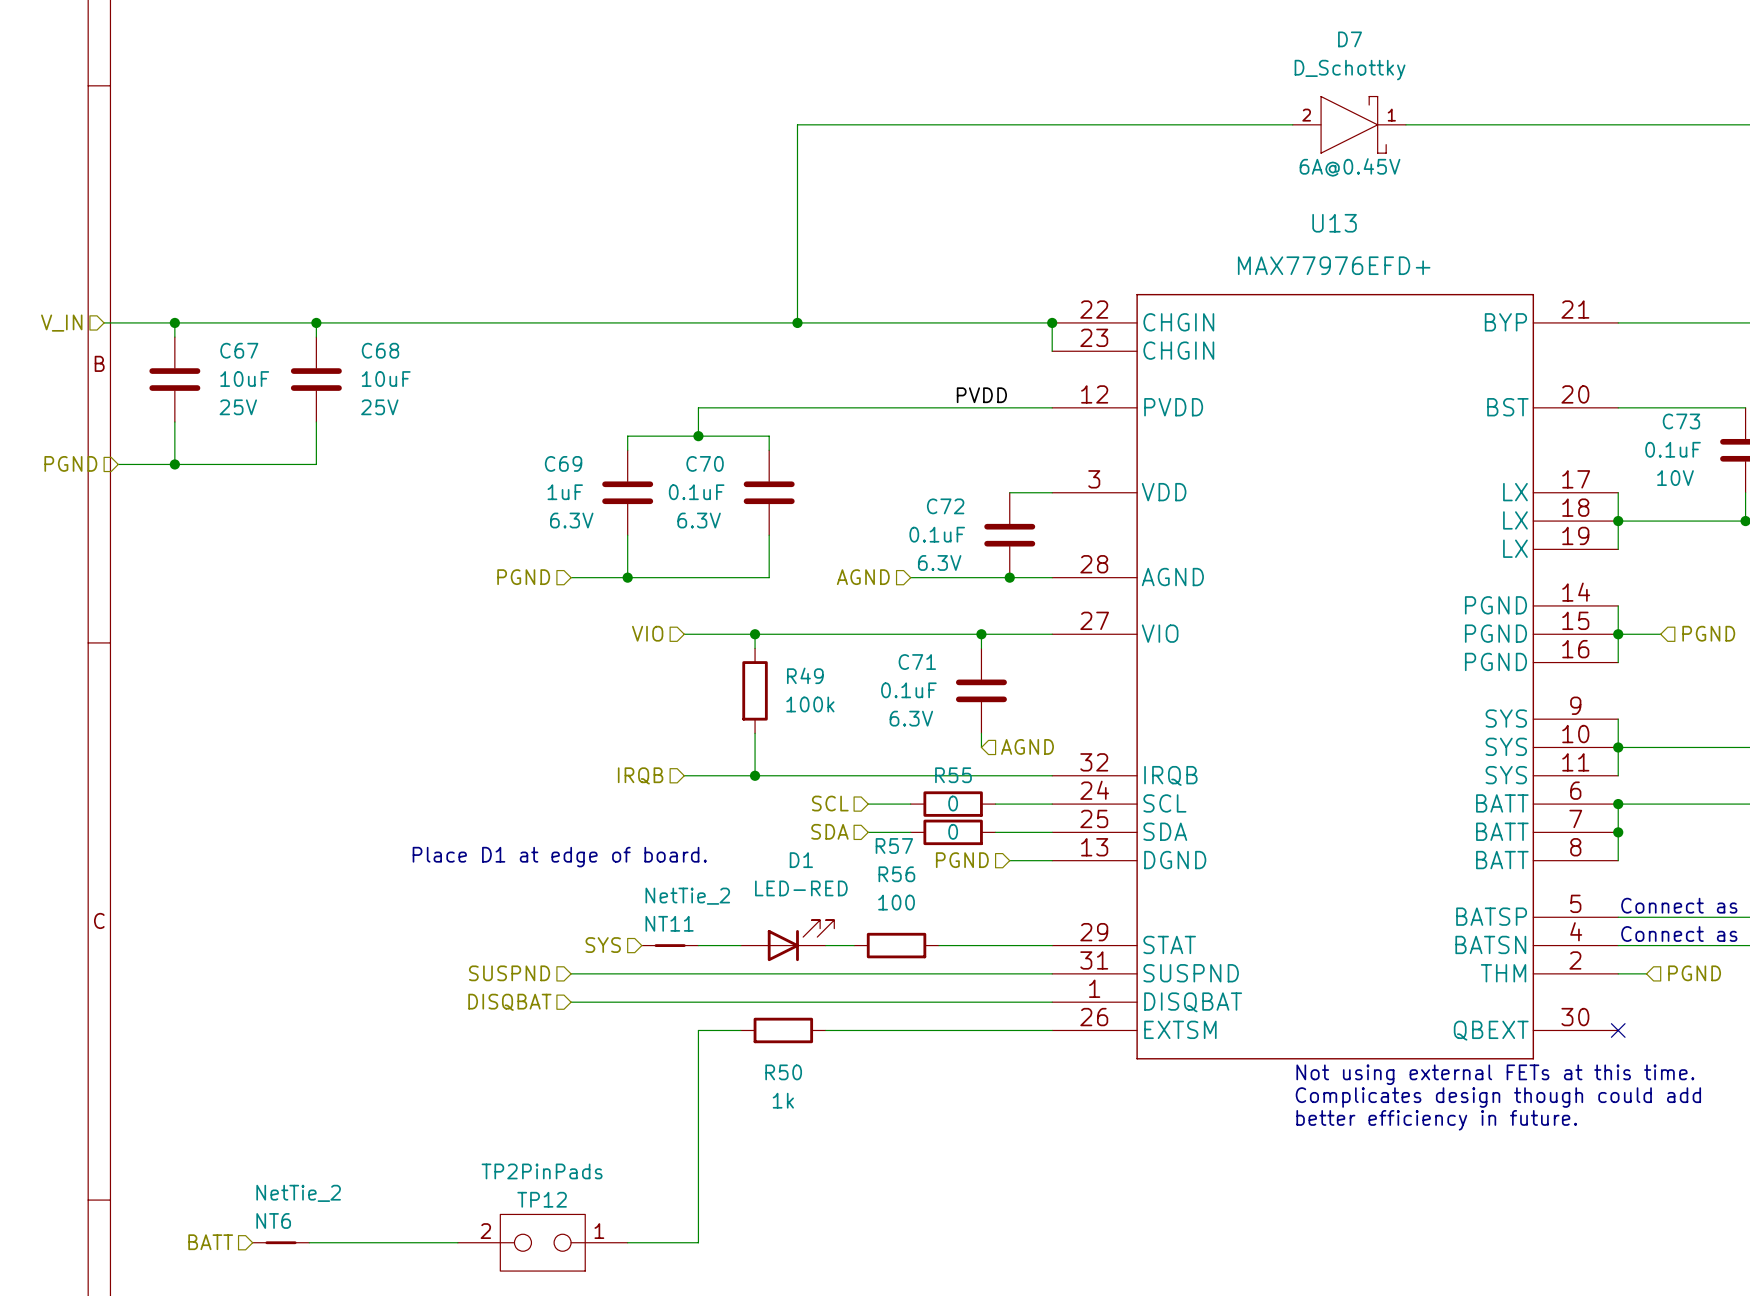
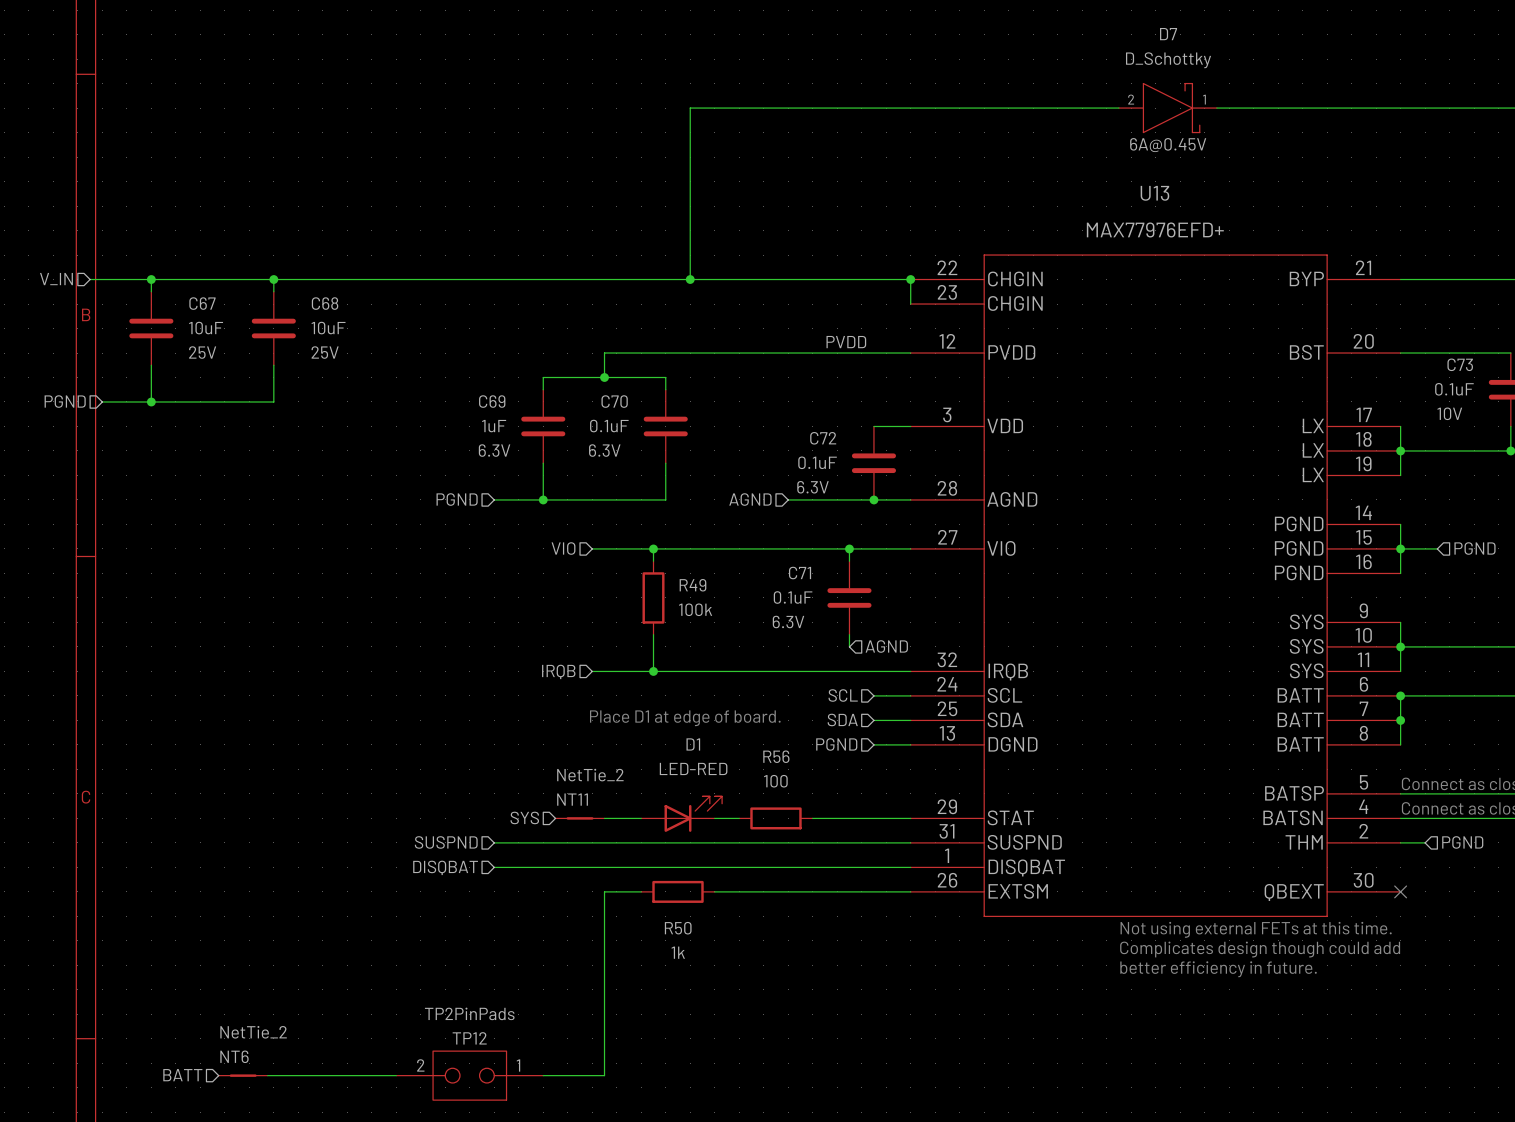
hierarchical label position: SCL (830, 803) -> SCL (843, 695)
wire: (868, 804) (910, 804) -> none
R55: 0 (953, 804) -> none
wire: (995, 804) (1009, 804) -> none
hierarchical label position: SDA (829, 831) -> SDA (842, 719)
wire: (868, 832) (910, 832) -> none
R57: 0 (953, 832) -> none
wire: (995, 832) (1009, 832) -> none
text position: Place D1 at edge of board. (559, 857) -> Place D1 at edge of board. (685, 718)

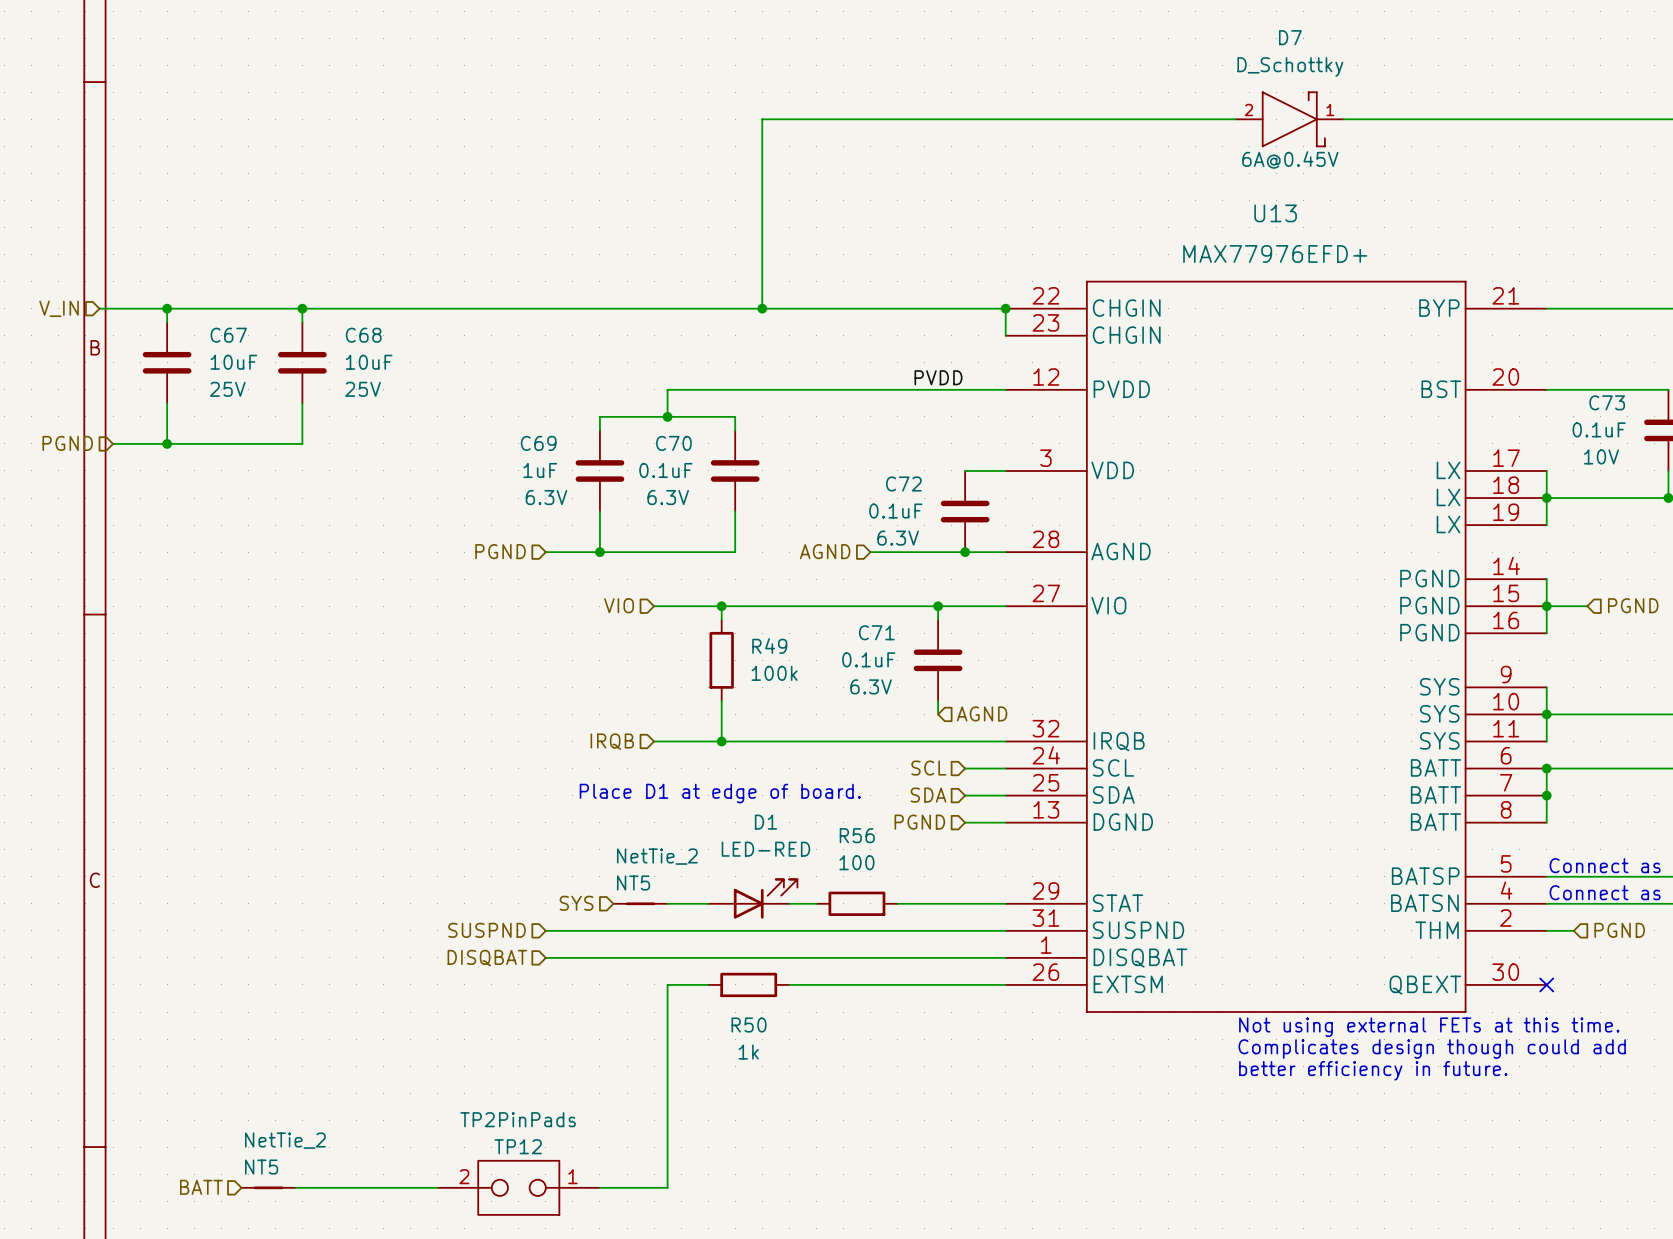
NT11 name: NT11 (572, 799) -> NT5 (633, 883)
NT6 name: NT6 (234, 1056) -> NT5 (261, 1167)

